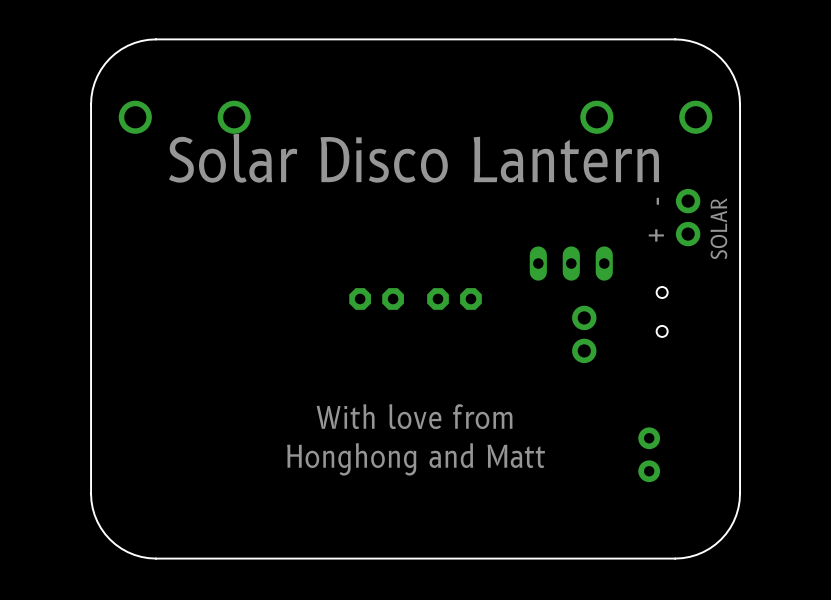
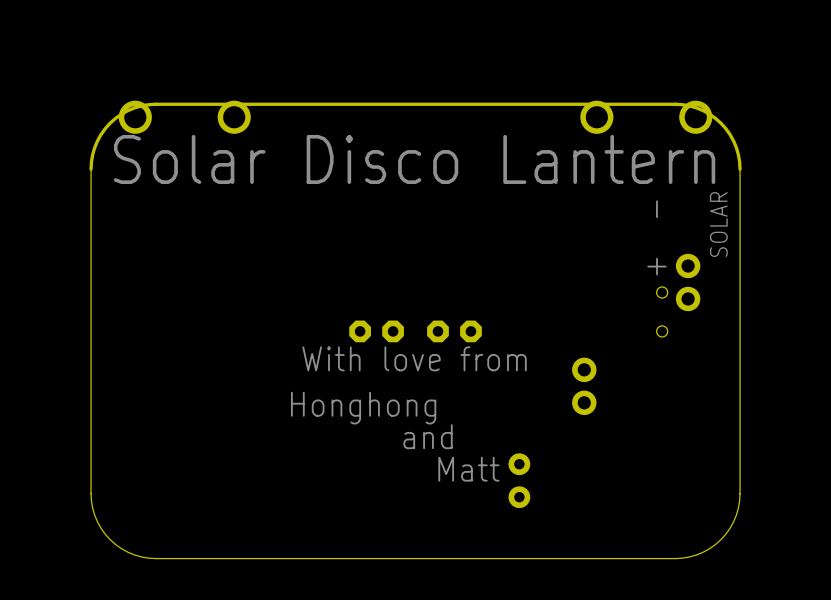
board edge: (740, 169) (739, 97) (733, 76) (725, 63) (709, 49) (696, 43) (675, 39) (155, 39) (141, 41) (127, 45) (115, 53) (105, 63) (94, 82) (91, 104) (91, 169) -> (740, 169) (736, 147) (730, 134) (721, 123) (709, 114) (696, 107) (675, 104) (148, 104) (134, 107) (121, 114) (105, 128) (94, 147) (91, 169)
part: (688, 217) -> none
part: (571, 263) -> none
part: none -> (688, 282)
part position: (376, 298) -> (376, 331)
part position: (454, 298) -> (454, 331)
part position: (584, 334) -> (584, 386)
text: none -> Honghong (363, 408)
text position: With love from (414, 416) -> With love from (414, 358)
text: none -> and (428, 436)
part position: (649, 454) -> (519, 480)
text: Honghong and Matt (416, 459) -> none
text: none -> Matt (468, 469)

